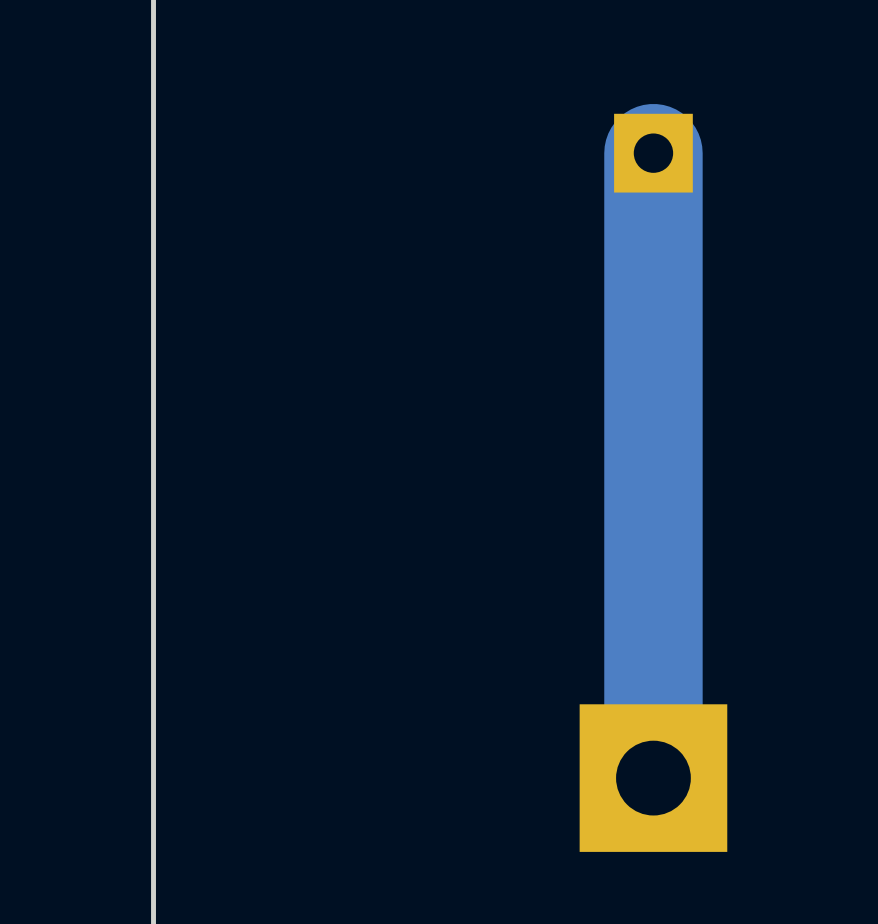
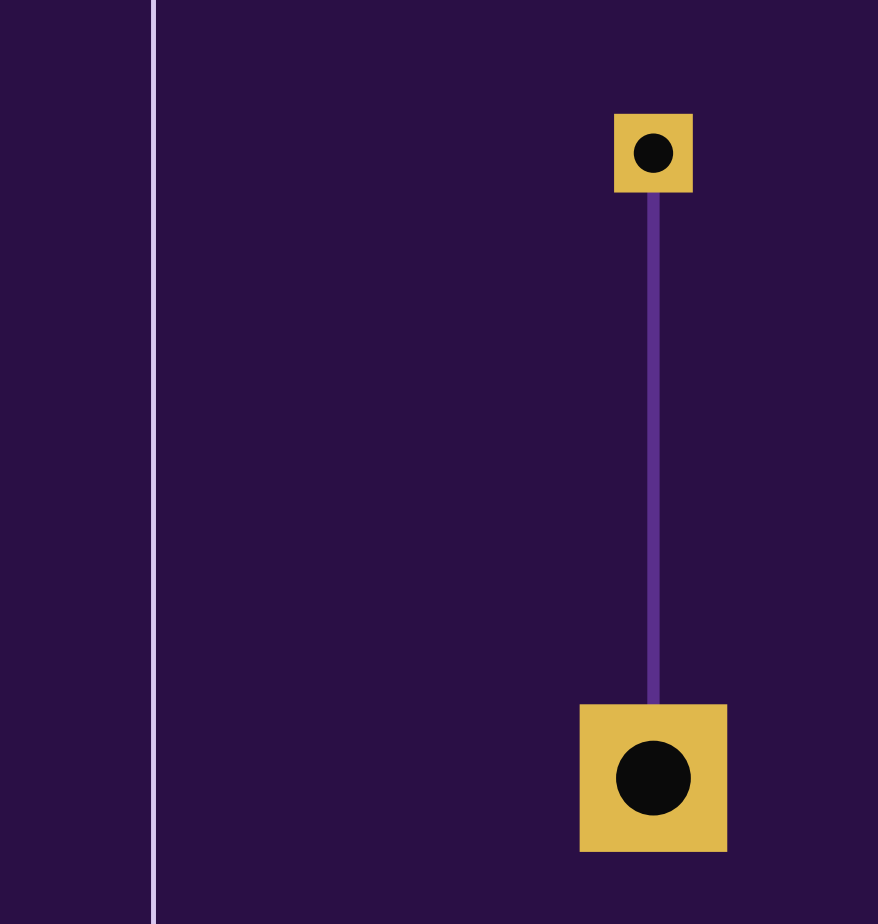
track width: thick (653, 153) (653, 778) -> thin (653, 153) (653, 778)

